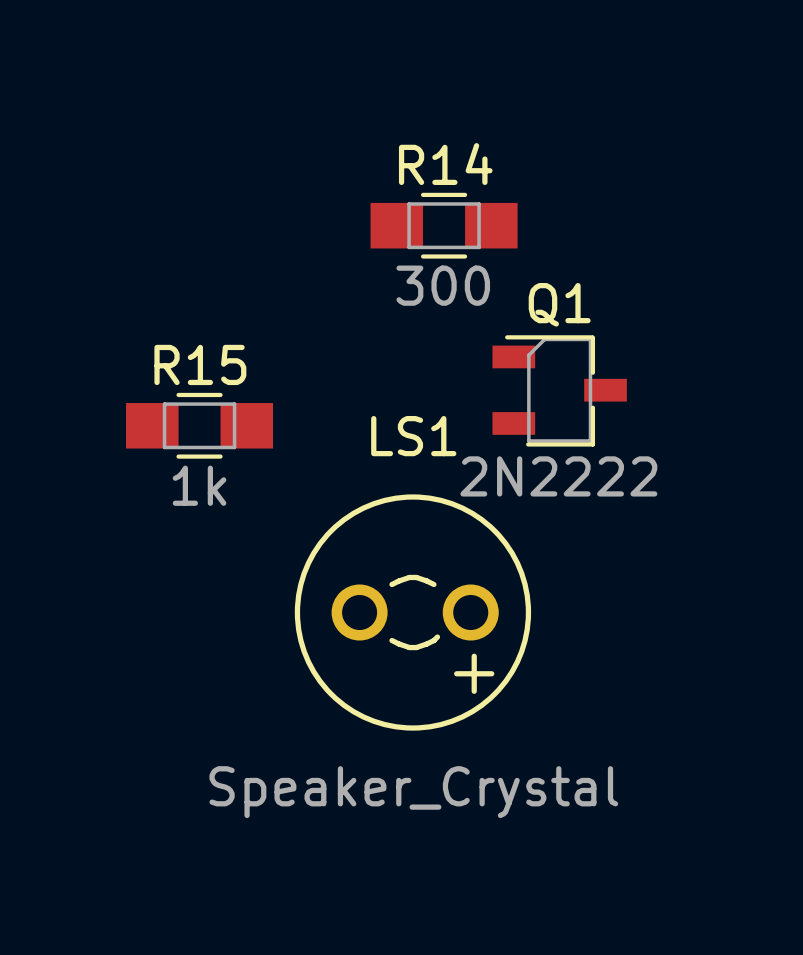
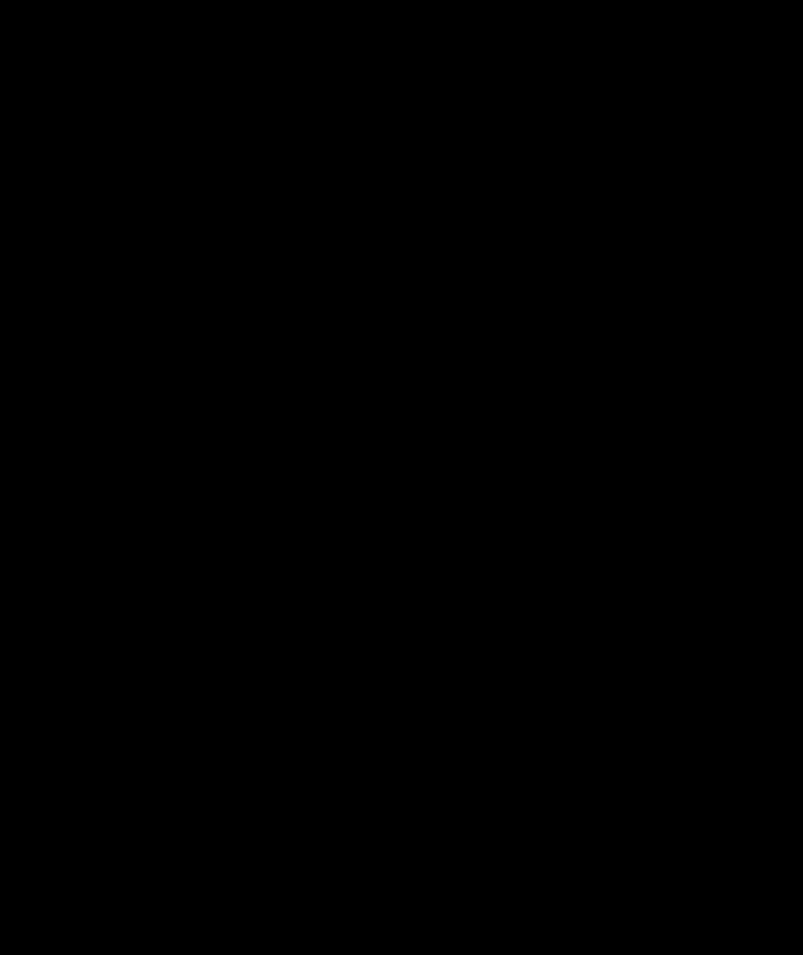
R14: 300 (444, 225) -> none
Q1: 2N2222 (559, 390) -> none
R15: 1k (199, 425) -> none
LS1: Speaker_Crystal (412, 612) -> none

